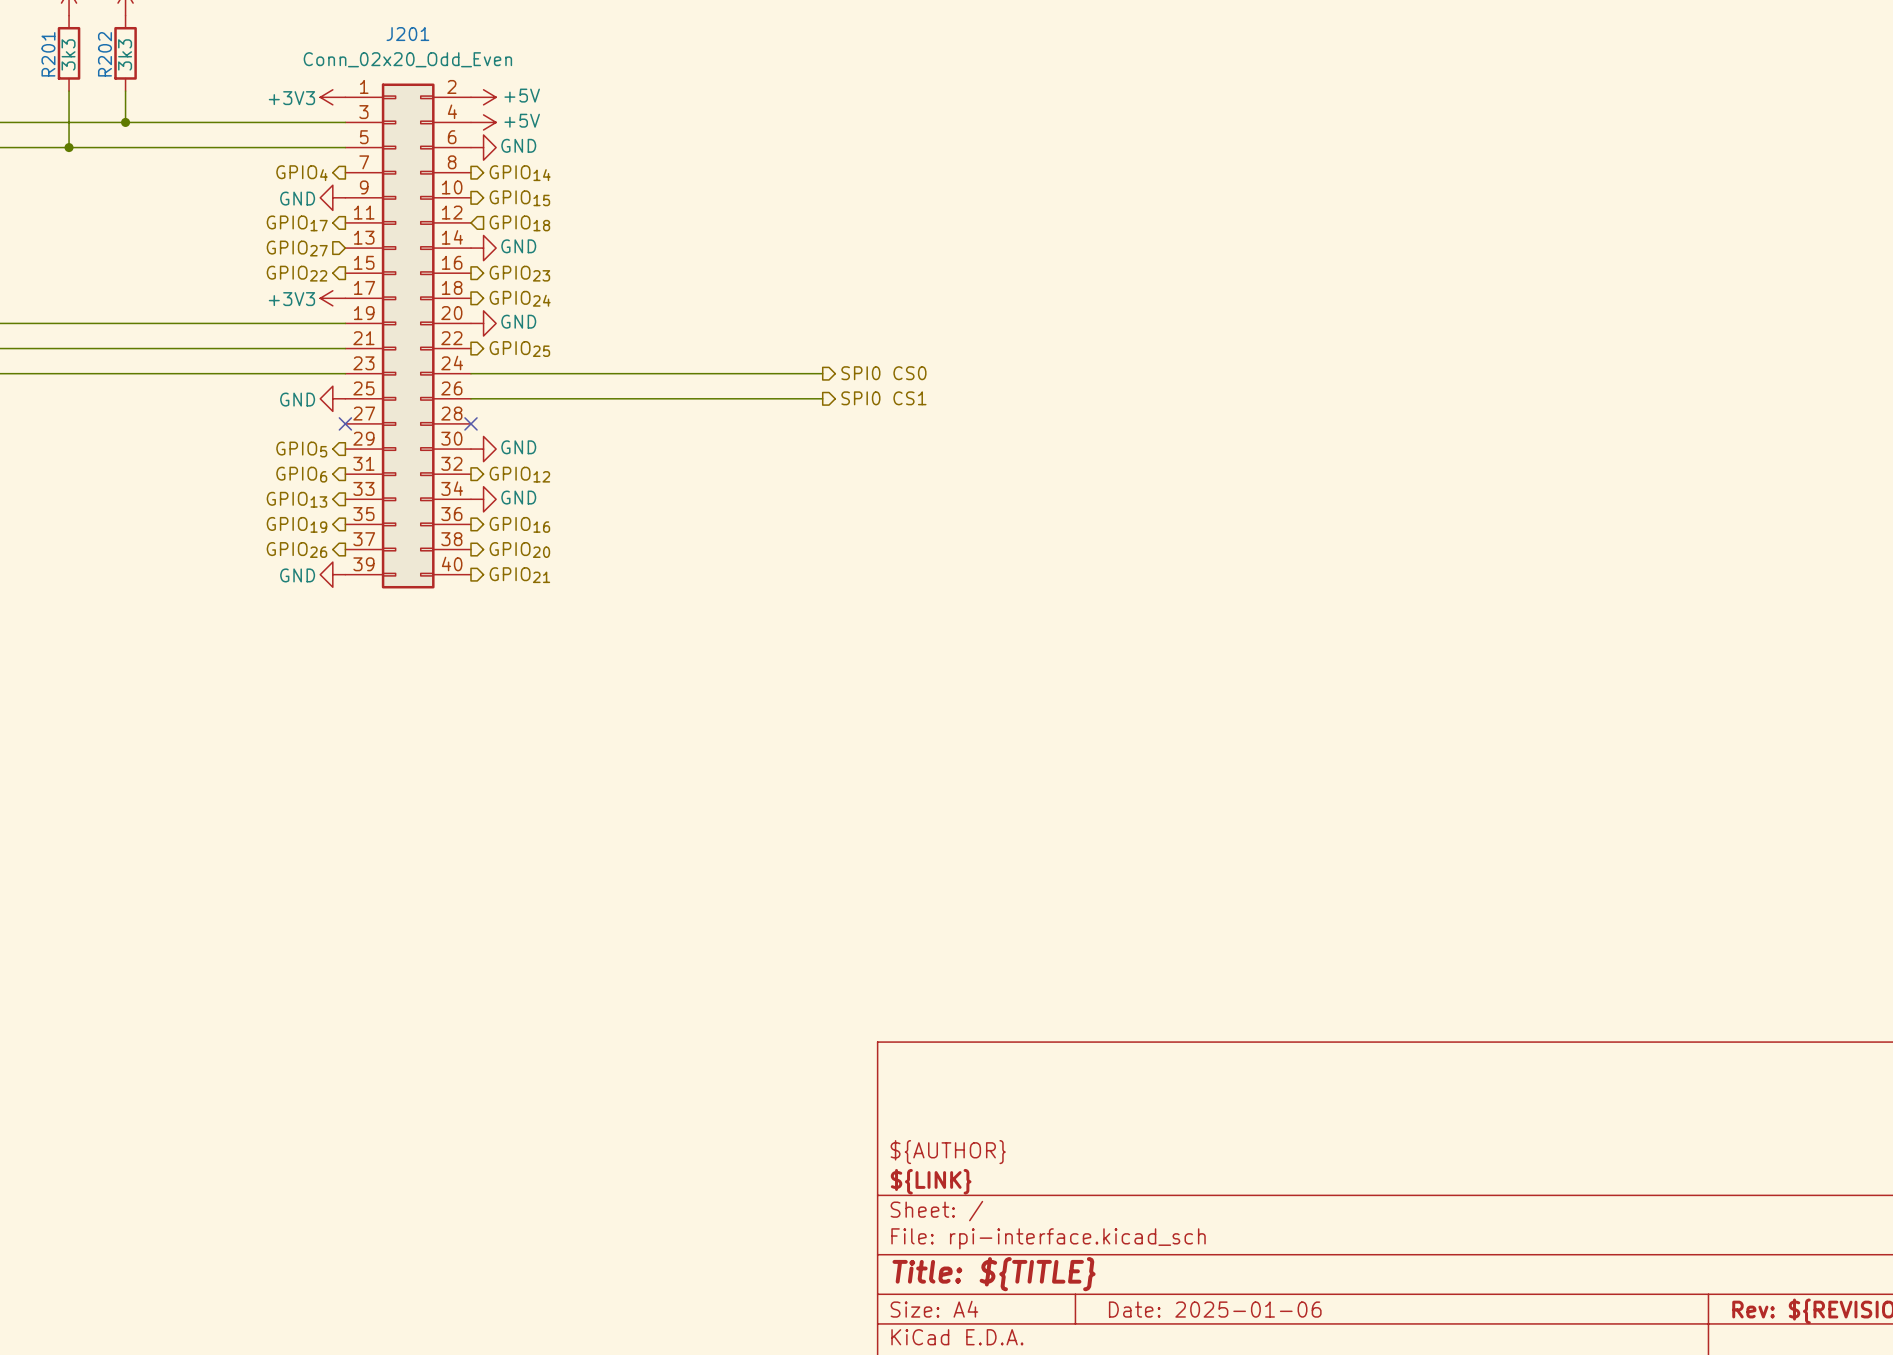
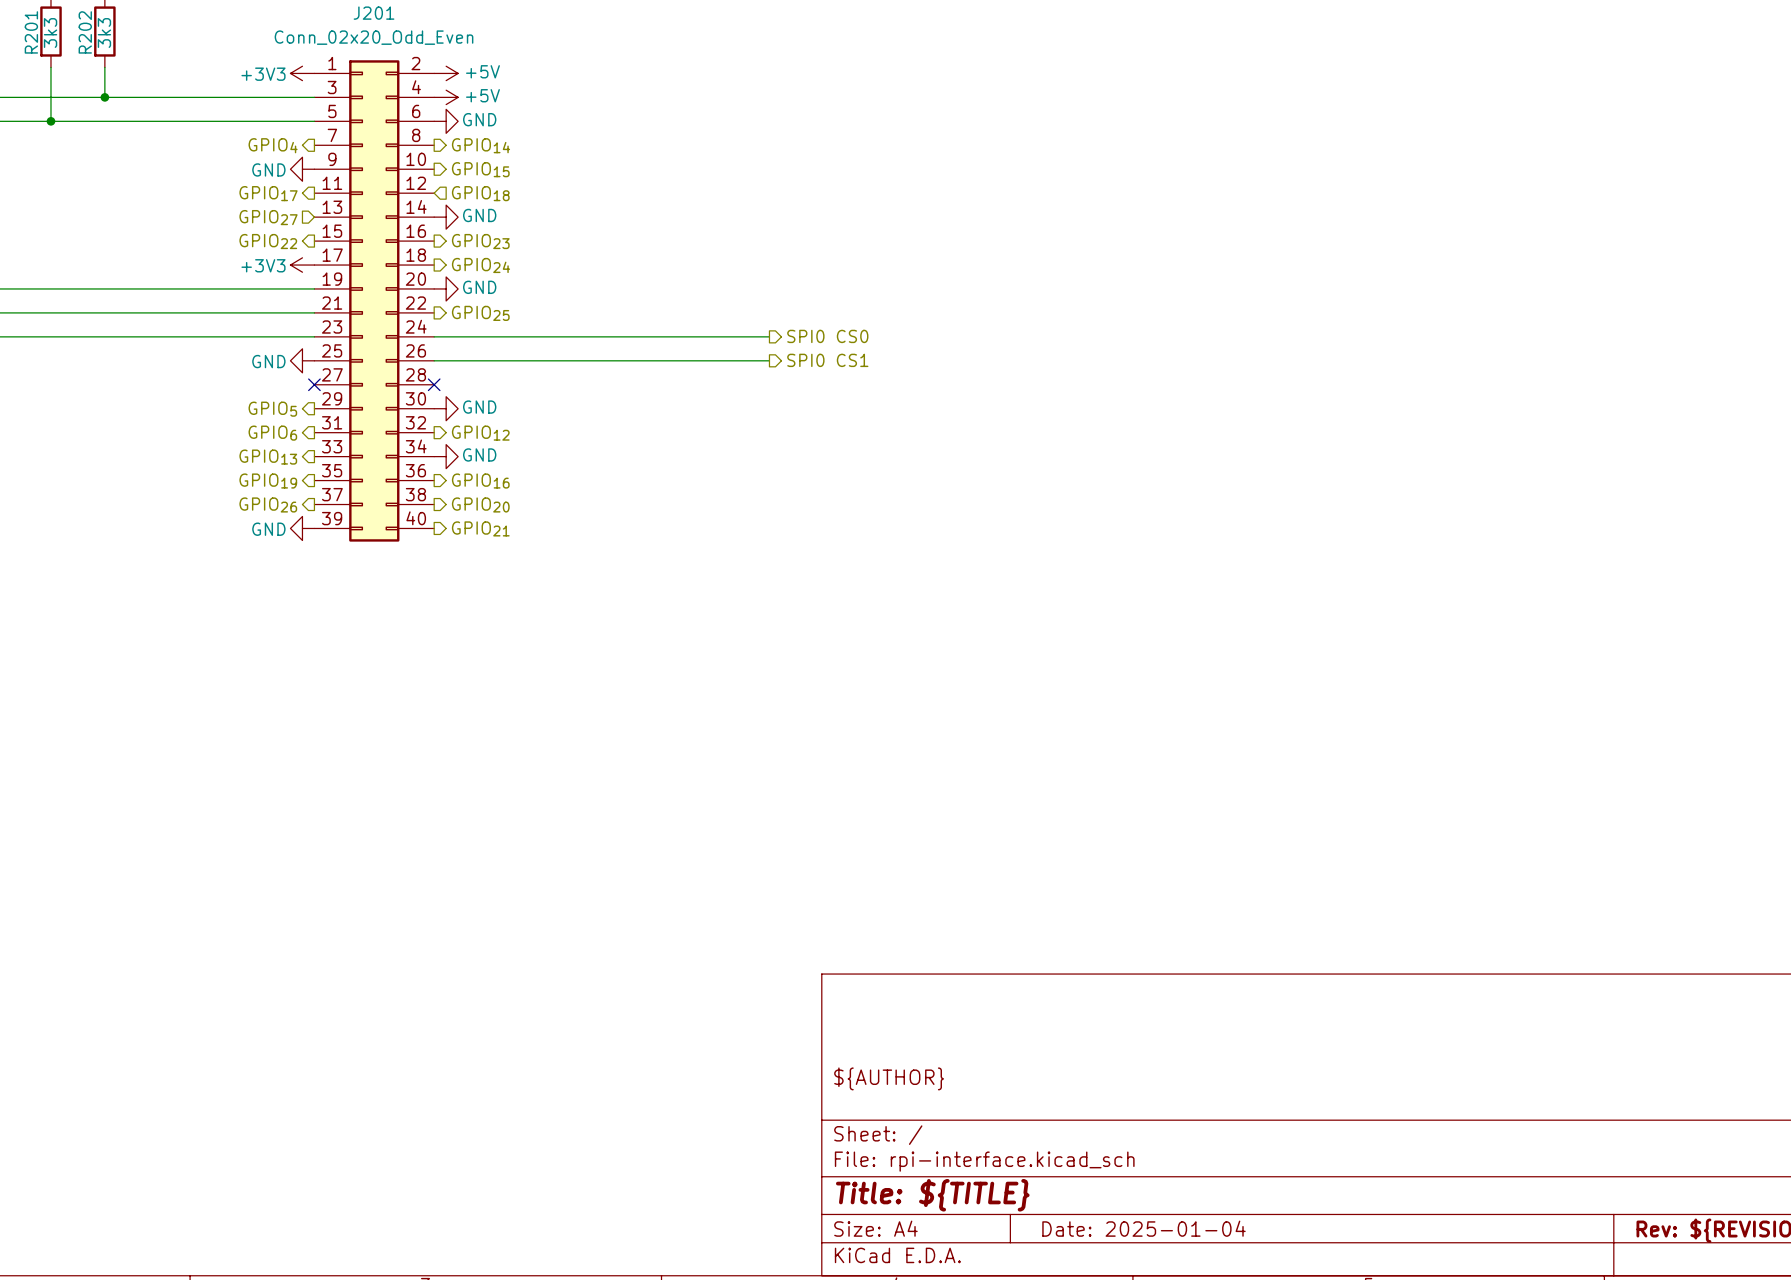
title block: ${LINK} (931, 1181) -> none
title block: Date: 2025-01-06 (1215, 1309) -> Date: 2025-01-04 (1143, 1228)

